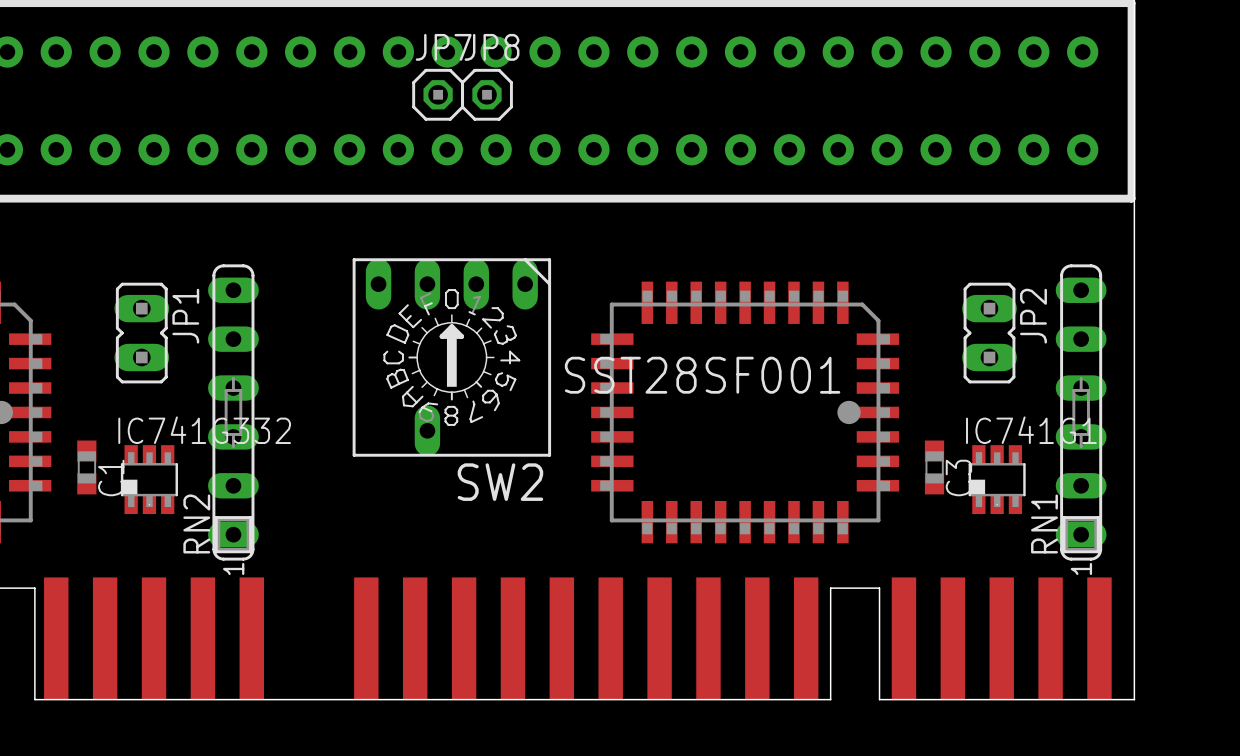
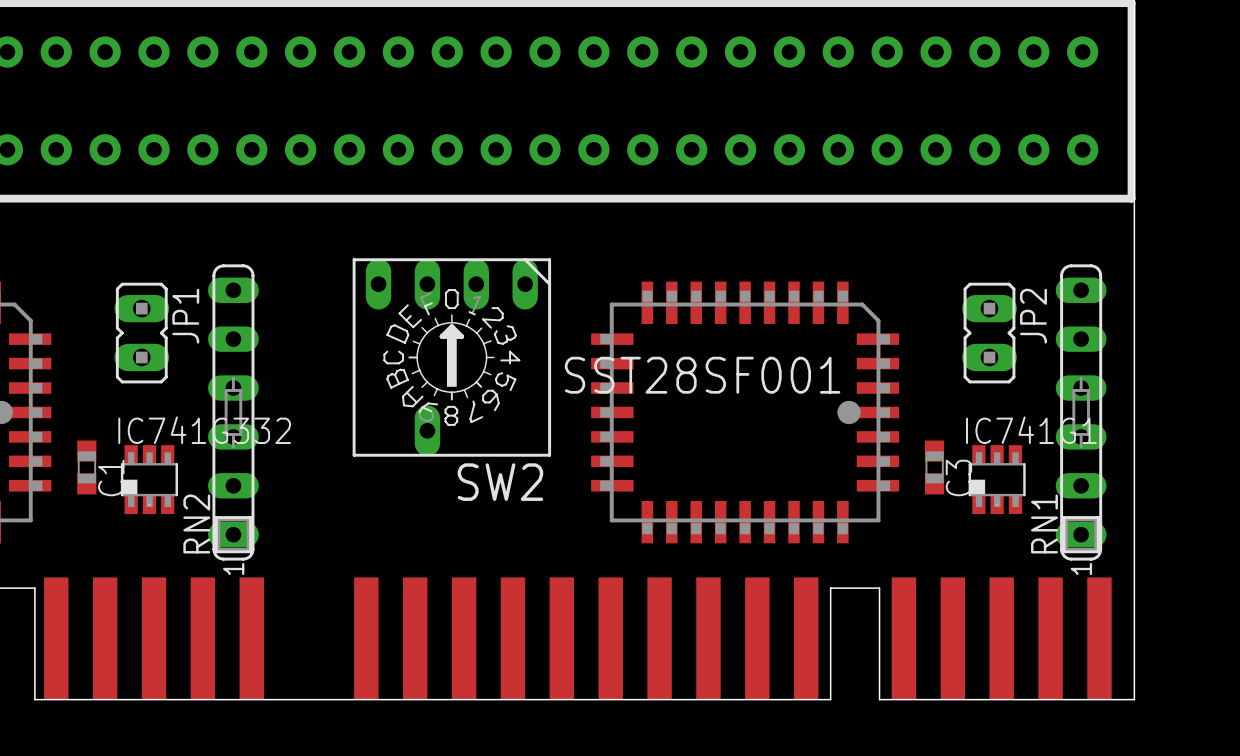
JP7: (438, 94) -> none
JP8: (486, 94) -> none

